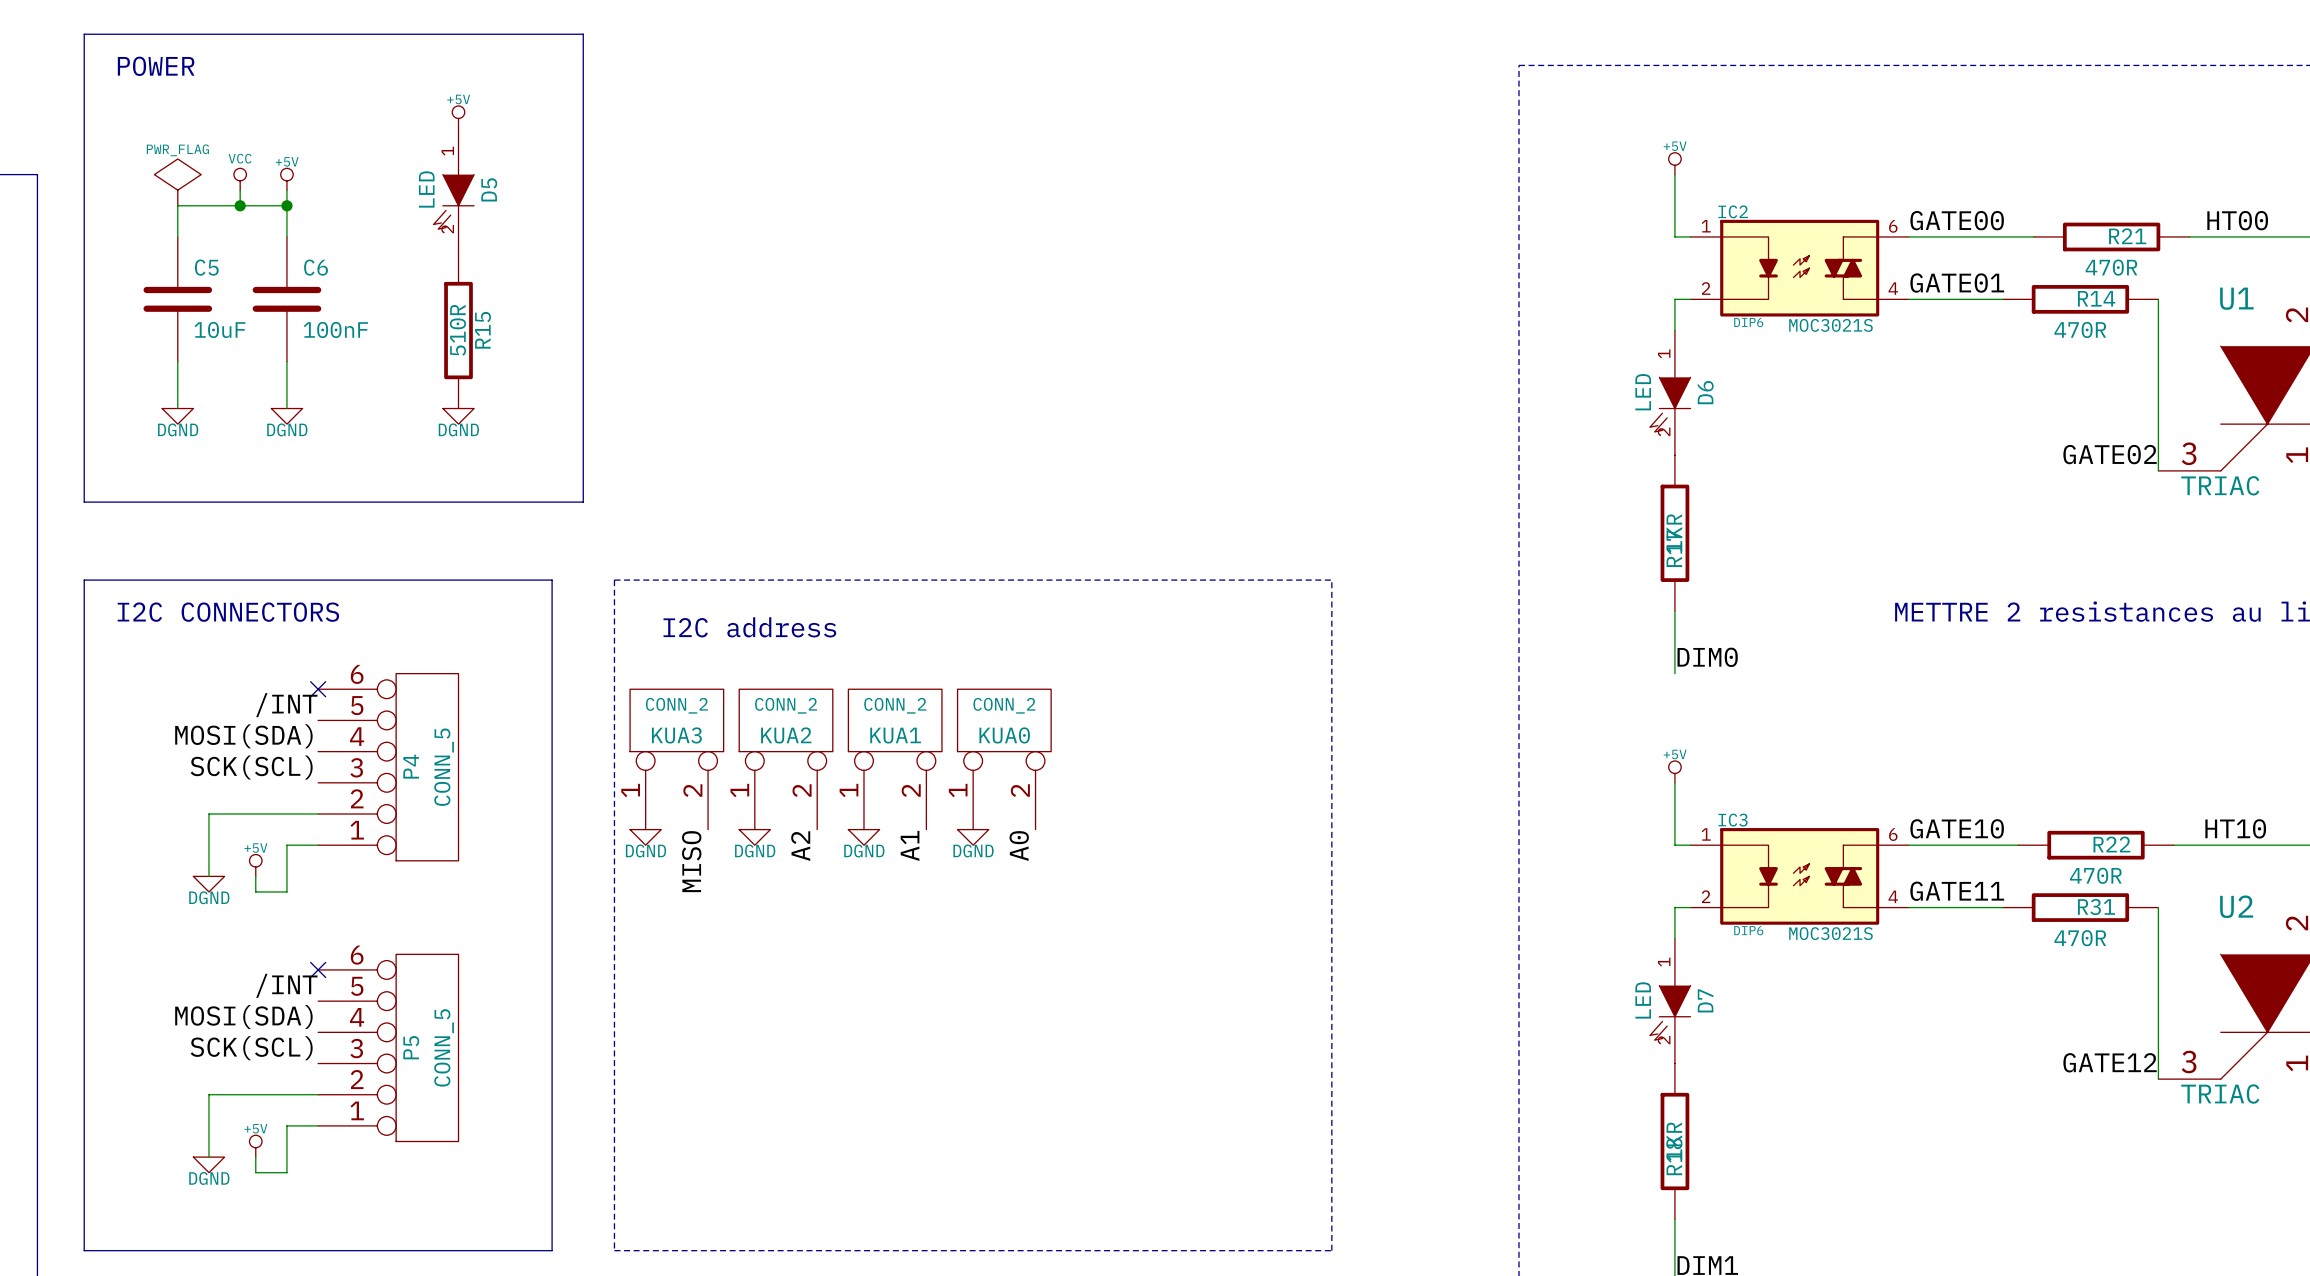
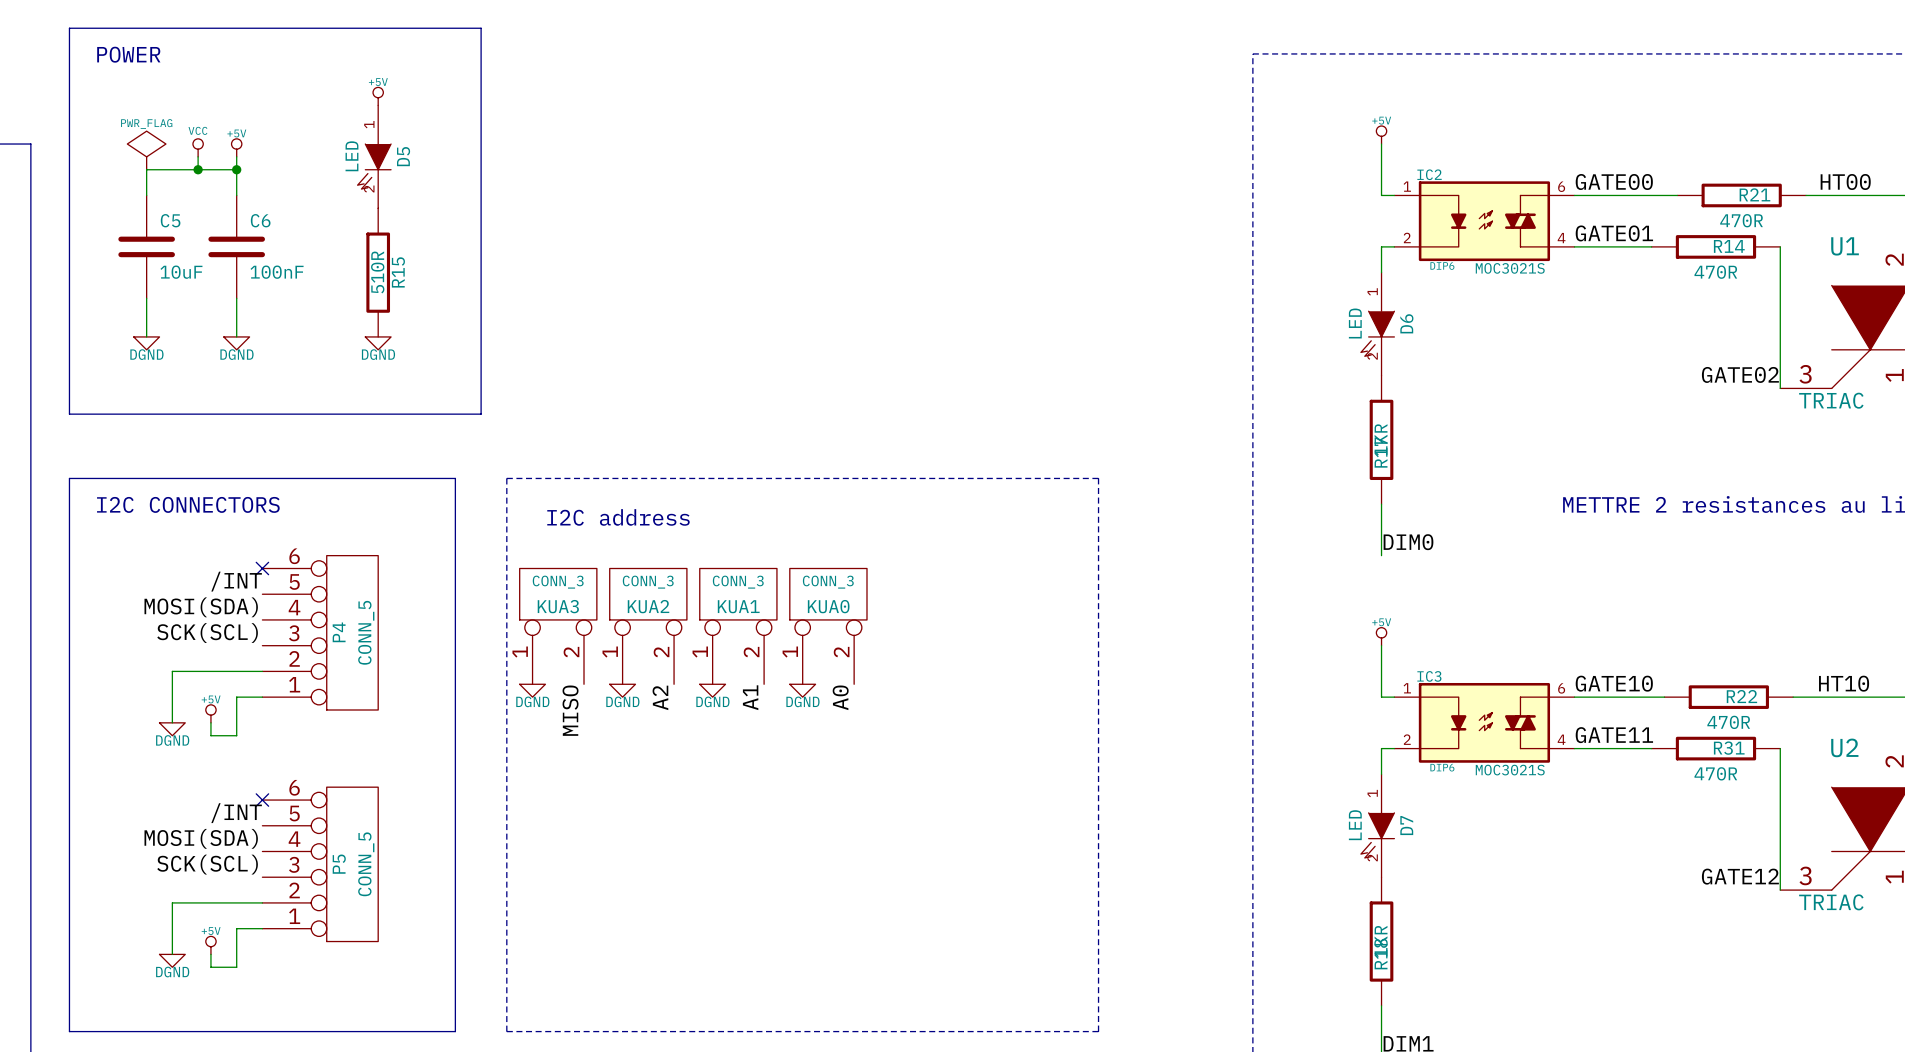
KUA3 value: CONN_2 (676, 705) -> CONN_3 (558, 582)
KUA2 value: CONN_2 (786, 705) -> CONN_3 (648, 582)
KUA1 value: CONN_2 (895, 705) -> CONN_3 (738, 582)
KUA0 value: CONN_2 (1004, 705) -> CONN_3 (828, 582)

